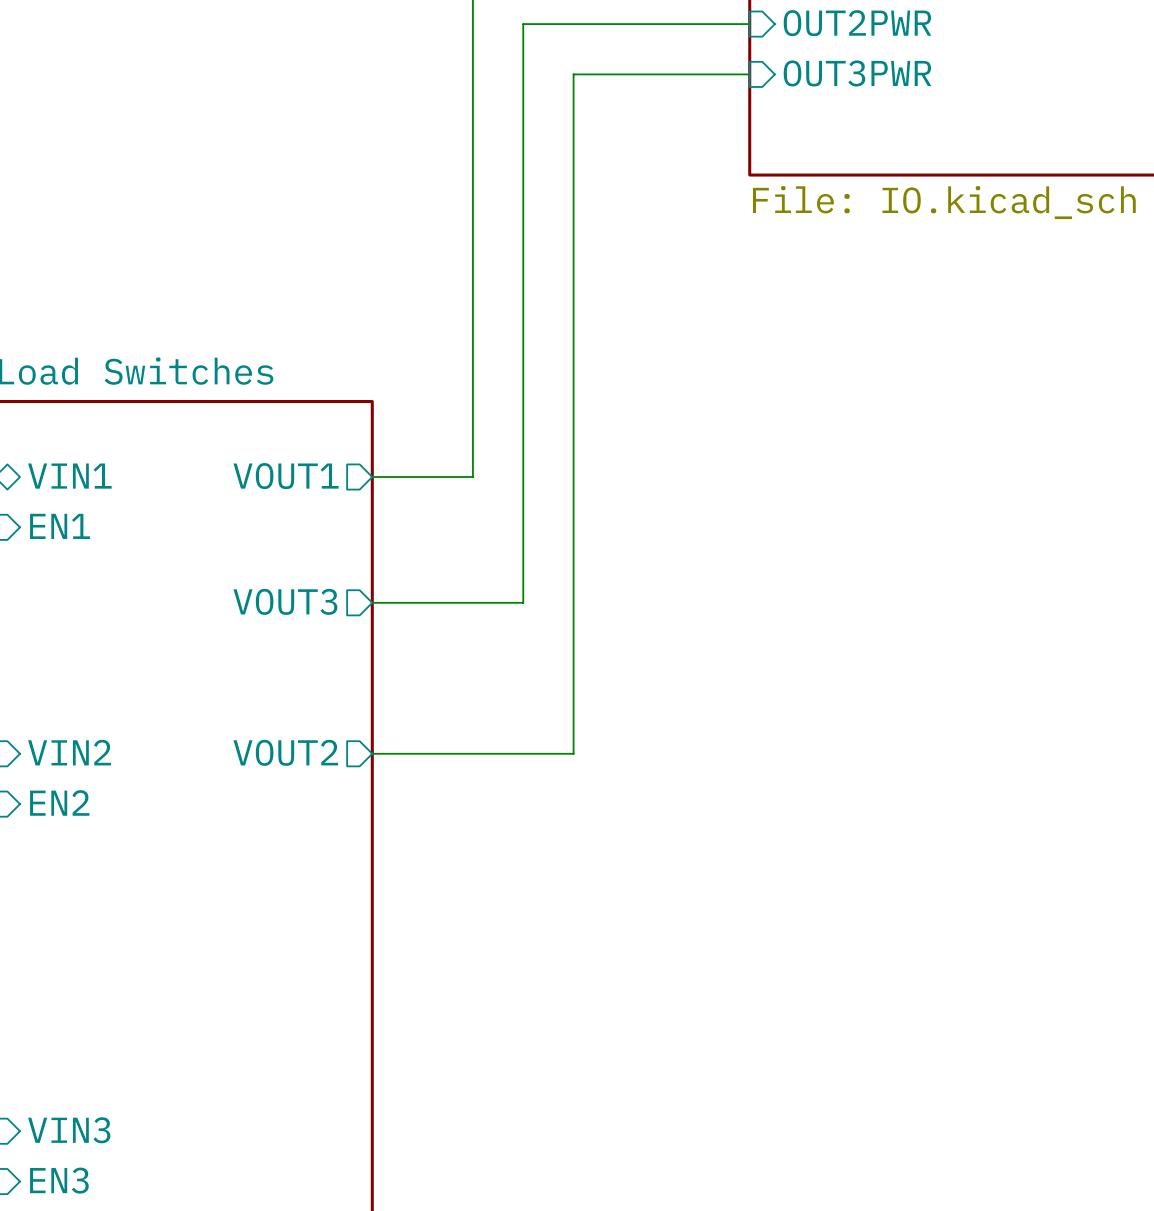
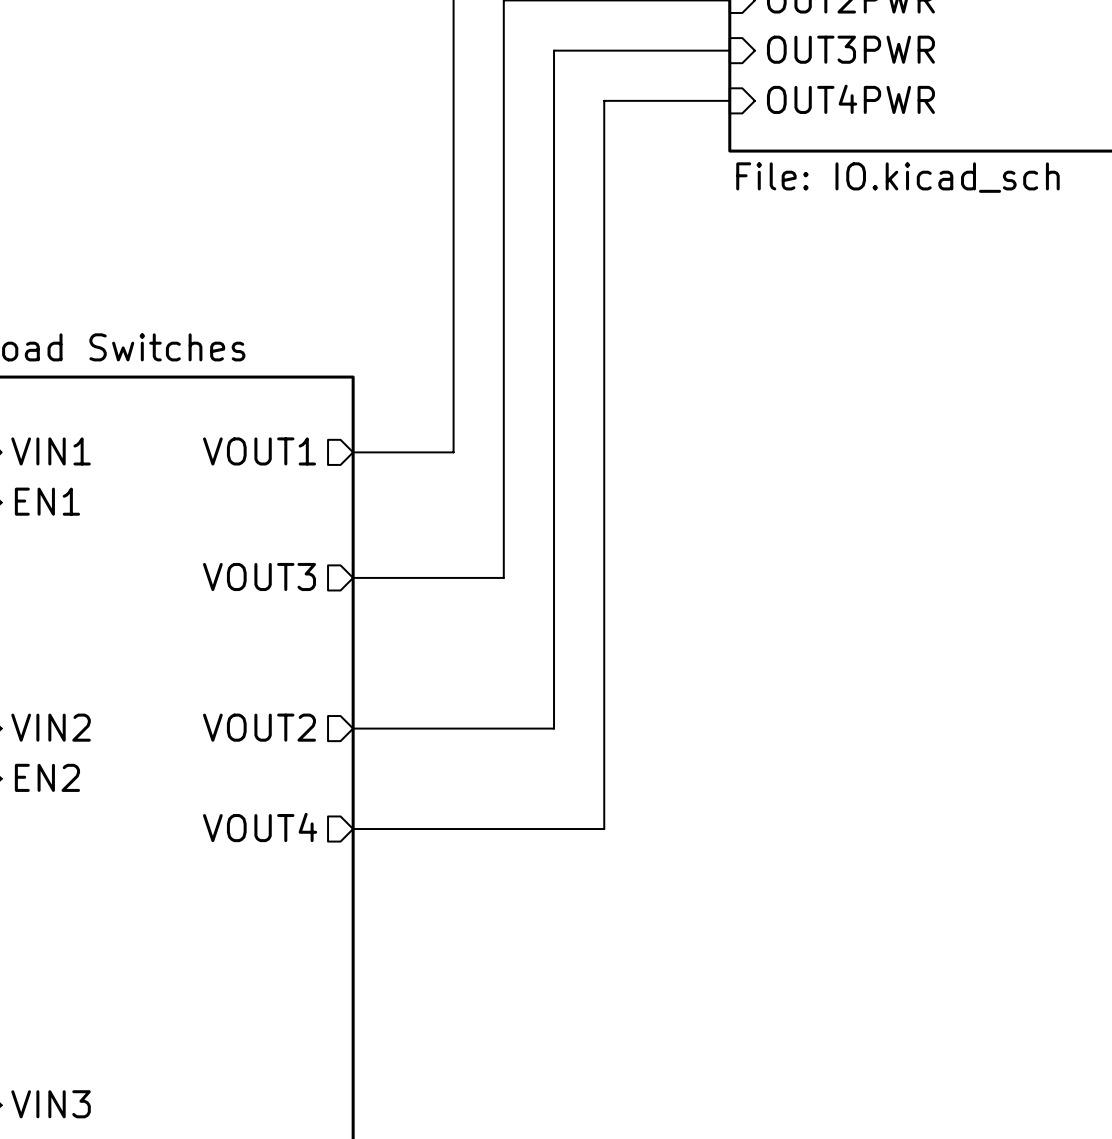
sheet pin: none -> OUT4PWR (850, 99)
wire: none -> (729, 100) (604, 100) (604, 829) (353, 829)
sheet pin: none -> VOUT4 (260, 827)

